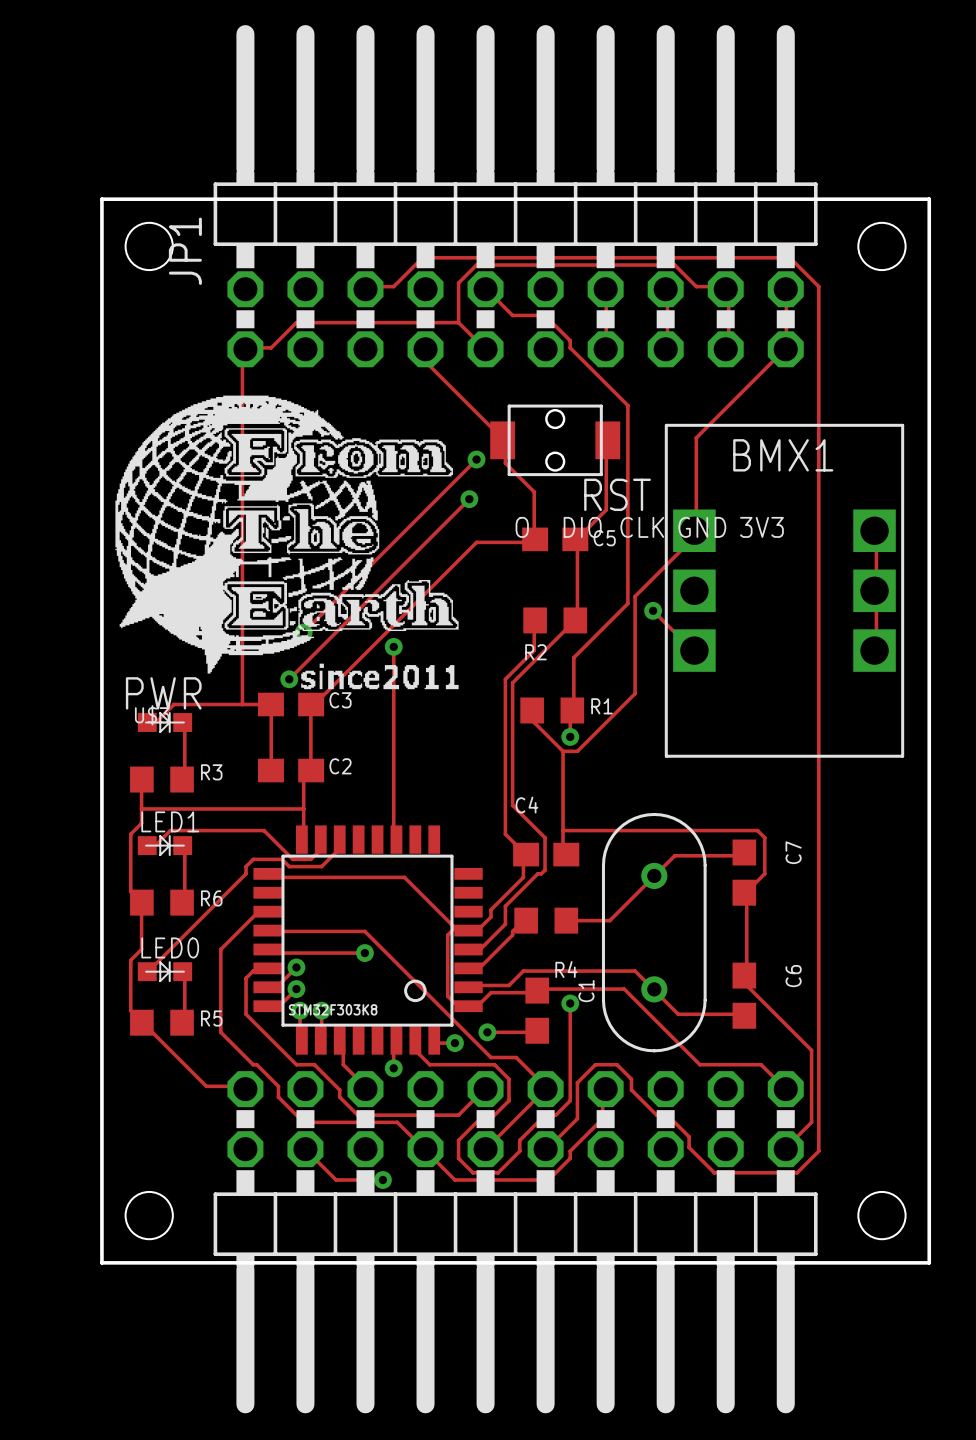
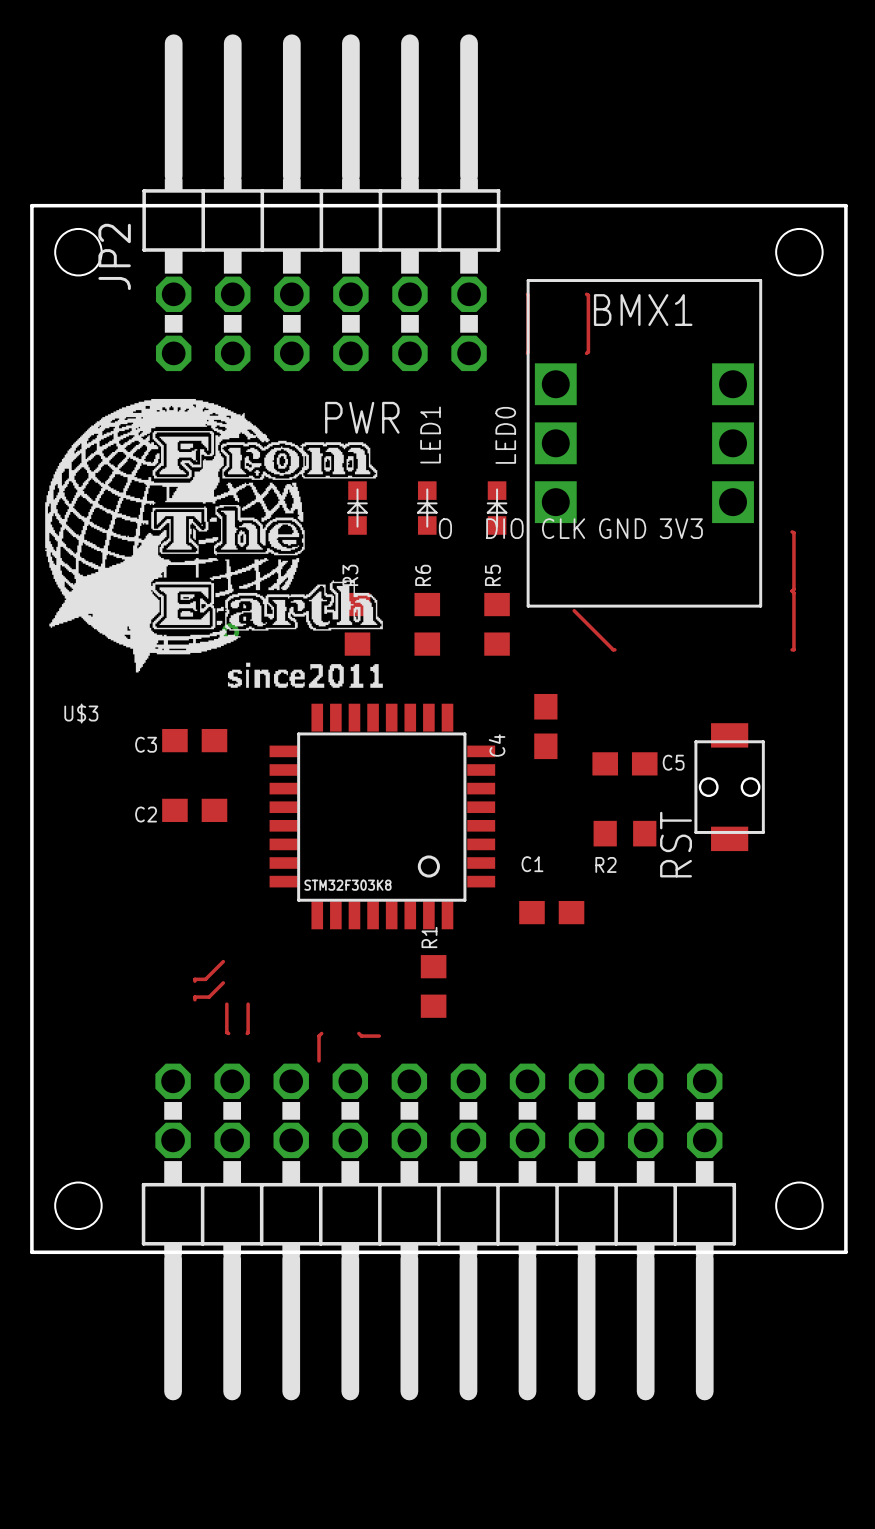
JP2: none -> (321, 202)
JP1: (515, 196) -> none
track: (365, 289) (368, 286) (393, 286) (422, 257) (789, 257) (818, 286) (818, 1151) (797, 1172) (714, 1172) (689, 1147) (689, 1136) (667, 1115) (656, 1115) (631, 1089) (631, 1079) (617, 1064) (595, 1064) (577, 1082) (577, 1118) (545, 1149) -> none
track: (485, 289) (512, 315) (545, 315) (570, 340) (570, 347) (627, 405) (627, 603) (573, 657) (573, 708) (570, 711) (570, 736) -> none
track: (785, 289) (785, 349) (696, 437) (696, 527) (692, 531) (692, 538) (635, 596) (635, 693) (577, 751) (563, 751) -> none
track: (458, 322) (296, 322) (271, 347) (246, 347) (242, 351) (242, 704) -> none
track: (458, 322) (485, 349) -> none
track: (458, 322) (458, 283) (476, 265) (674, 265) (696, 286) (725, 286) (728, 290) (728, 347) (725, 349) -> none
track: (425, 349) (426, 362) (505, 441) (505, 463) (534, 491) (535, 539) (534, 542) (476, 542) (314, 704) (310, 704) (311, 770) (303, 780) (303, 837) (301, 839) -> none
RST rotation: 0° (555, 440) -> 90° clockwise (729, 787)
RST position: (555, 440) -> (729, 787)
track: (607, 440) (606, 441) (606, 509) (575, 539) (577, 542) (577, 618) (512, 682) (512, 805) (545, 837) (545, 870) (541, 873) (537, 873) (505, 906) (505, 924) (480, 949) (468, 949) -> none
track: (476, 459) (303, 632) -> none
via: (476, 459) -> none
track: (469, 499) (289, 679) -> none
via: (469, 499) -> none
C5 position: (555, 539) -> (624, 763)
BMX1 position: (784, 590) -> (644, 443)
via: (653, 610) -> none
track: (535, 620) (534, 650) (505, 679) (505, 834) (526, 854) (523, 855) (523, 877) (490, 909) (490, 917) (480, 927) (469, 927) (468, 930) -> none
R2 position: (555, 620) -> (624, 833)
track: (393, 646) (393, 837) (396, 839) -> none
via: (393, 646) -> none
via: (289, 679) -> none
PWR name position: PWR (163, 693) -> PWR (362, 417)
C3 name position: C3 (340, 700) -> C3 (146, 744)
C3 position: (291, 704) -> (194, 740)
R1 name position: R1 (601, 706) -> R1 (429, 937)
track: (532, 710) (534, 711) (534, 722) (563, 751) -> none
R1 rotation: 0° (552, 710) -> 90° clockwise (433, 986)
R1 position: (552, 710) -> (433, 986)
track: (147, 722) (155, 722) (173, 704) (271, 704) (270, 770) -> none
PWR rotation: 0° (164, 722) -> 90° counterclockwise (357, 508)
PWR position: (164, 722) -> (357, 508)
track: (182, 722) (184, 722) (184, 776) (182, 779) -> none
via: (570, 736) -> none
track: (563, 751) (563, 852) (566, 854) -> none
C2 name position: C2 (340, 766) -> C2 (146, 814)
C2 position: (291, 770) -> (194, 810)
R3 name position: R3 (211, 772) -> R3 (350, 575)
track: (141, 779) (141, 823) (130, 834) (130, 891) (141, 902) (141, 949) (130, 960) (130, 1010) (206, 1086) (242, 1086) (245, 1089) -> none
R3 rotation: 0° (161, 779) -> 90° clockwise (357, 624)
R3 position: (161, 779) -> (357, 624)
C4 name position: C4 (526, 805) -> C4 (497, 745)
track: (141, 808) (303, 808) -> none
LED1 name position: LED1 (170, 821) -> LED1 (430, 434)
track: (563, 830) (757, 830) (764, 837) (764, 873) (744, 892) (746, 895) (746, 974) (744, 975) (746, 978) (746, 985) (811, 1050) (811, 1122) (785, 1149) -> none
track: (320, 839) (318, 841) (318, 852) (310, 859) (292, 859) (264, 830) (170, 830) (155, 844) (147, 845) -> none
track: (339, 839) (339, 848) (321, 866) (289, 866) (282, 859) (253, 859) (246, 866) (246, 873) (147, 971) -> none
LED1 rotation: 0° (164, 845) -> 90° counterclockwise (427, 508)
LED1 position: (164, 845) -> (427, 508)
track: (182, 845) (184, 848) (184, 902) (182, 902) -> none
track: (744, 852) (743, 855) (674, 855) (609, 920) (566, 920) -> none
C4 rotation: 0° (546, 854) -> 90° clockwise (545, 726)
C4 position: (546, 854) -> (545, 726)
C7: (744, 872) -> none
track: (267, 873) (267, 877) (404, 877) (454, 927) -> none
R6 name position: R6 (211, 898) -> R6 (423, 575)
R6 rotation: 0° (161, 902) -> 90° clockwise (427, 624)
R6 position: (161, 902) -> (427, 624)
track: (267, 911) (256, 913) (220, 949) (220, 1032) (278, 1086) (278, 1097) (303, 1122) (397, 1122) (454, 1180) (548, 1180) (570, 1158) (570, 1151) (602, 1118) (602, 1089) (605, 1089) -> none
track: (526, 920) (523, 920) (512, 931) (512, 935) (480, 967) (468, 968) -> none
R4: (546, 920) -> none
track: (454, 927) (447, 935) (447, 996) (454, 1003) (465, 1003) (468, 1006) (469, 1003) (480, 1003) (490, 992) (534, 992) (537, 989) (624, 989) (699, 1064) (761, 1064) (785, 1089) -> none
track: (267, 930) (364, 931) (490, 1057) (516, 1057) (545, 1086) (545, 1089) (485, 1149) -> none
part: (654, 932) -> none
part position: (368, 940) -> (382, 816)
track: (267, 949) (267, 953) (364, 953) -> none
via: (364, 953) -> none
via: (296, 967) -> none
track: (267, 968) (264, 971) (253, 971) (246, 978) (246, 1014) (296, 1064) (314, 1064) (339, 1089) (339, 1097) (357, 1115) (458, 1115) (485, 1089) -> none
LED0 rotation: 0° (164, 971) -> 90° counterclockwise (497, 508)
LED0 position: (164, 971) -> (497, 508)
track: (182, 971) (184, 974) (184, 1021) (182, 1022) -> none
track: (468, 987) (469, 985) (509, 985) (523, 971) (635, 971) (678, 1014) (744, 1015) -> none
via: (296, 989) -> none
C1 name position: C1 (586, 991) -> C1 (532, 864)
C6: (744, 995) -> none
track: (570, 1003) (570, 1100) (555, 1115) (545, 1115) (519, 1140) (519, 1151) (498, 1172) (472, 1172) (458, 1158) (458, 1140) (476, 1122) (487, 1122) (509, 1100) (509, 1079) (494, 1064) (429, 1064) (418, 1053) (418, 1043) (415, 1040) -> none
via: (570, 1003) -> none
via: (300, 1010) -> none
via: (321, 1010) -> none
C1 rotation: 0° (537, 1010) -> 90° clockwise (551, 912)
C1 position: (537, 1010) -> (551, 912)
R5 name position: R5 (211, 1018) -> R5 (492, 575)
R5 rotation: 0° (161, 1022) -> 90° clockwise (497, 624)
R5 position: (161, 1022) -> (497, 624)
track: (537, 1030) (487, 1032) -> none
via: (487, 1032) -> none
track: (339, 1040) (343, 1043) (343, 1064) (365, 1089) -> none
via: (454, 1043) -> none
via: (393, 1068) -> none
track: (305, 1149) (336, 1180) (382, 1180) -> none
via: (382, 1180) -> none

